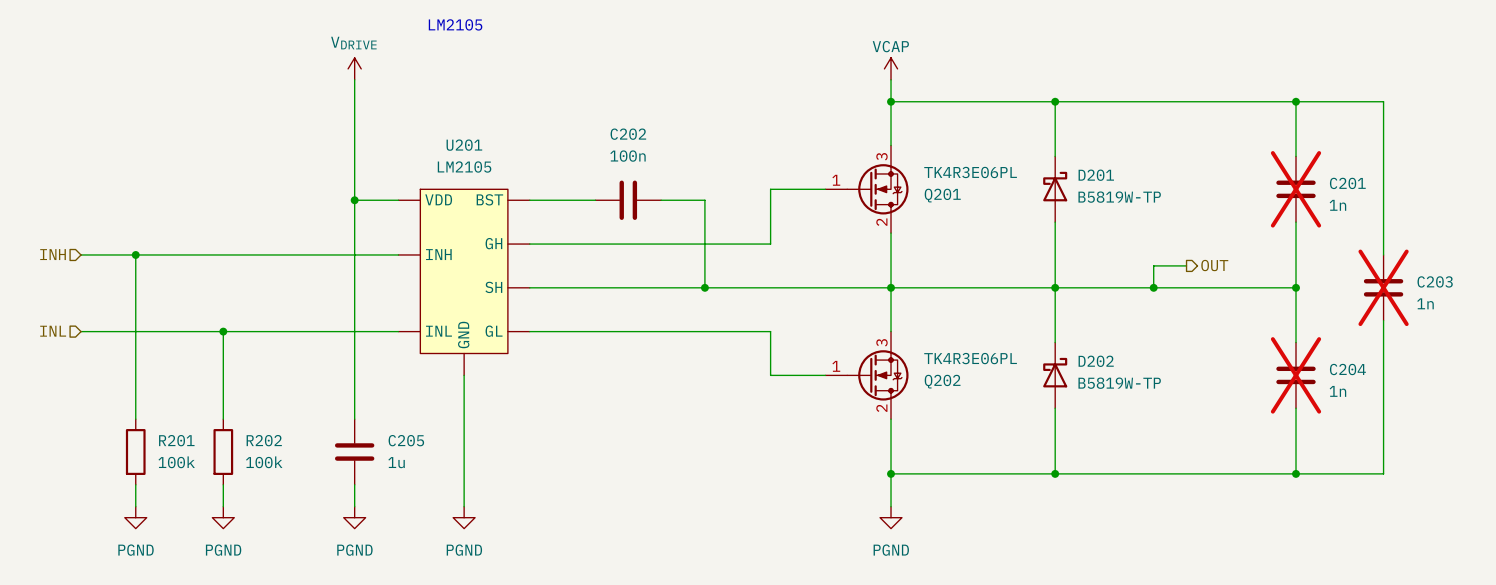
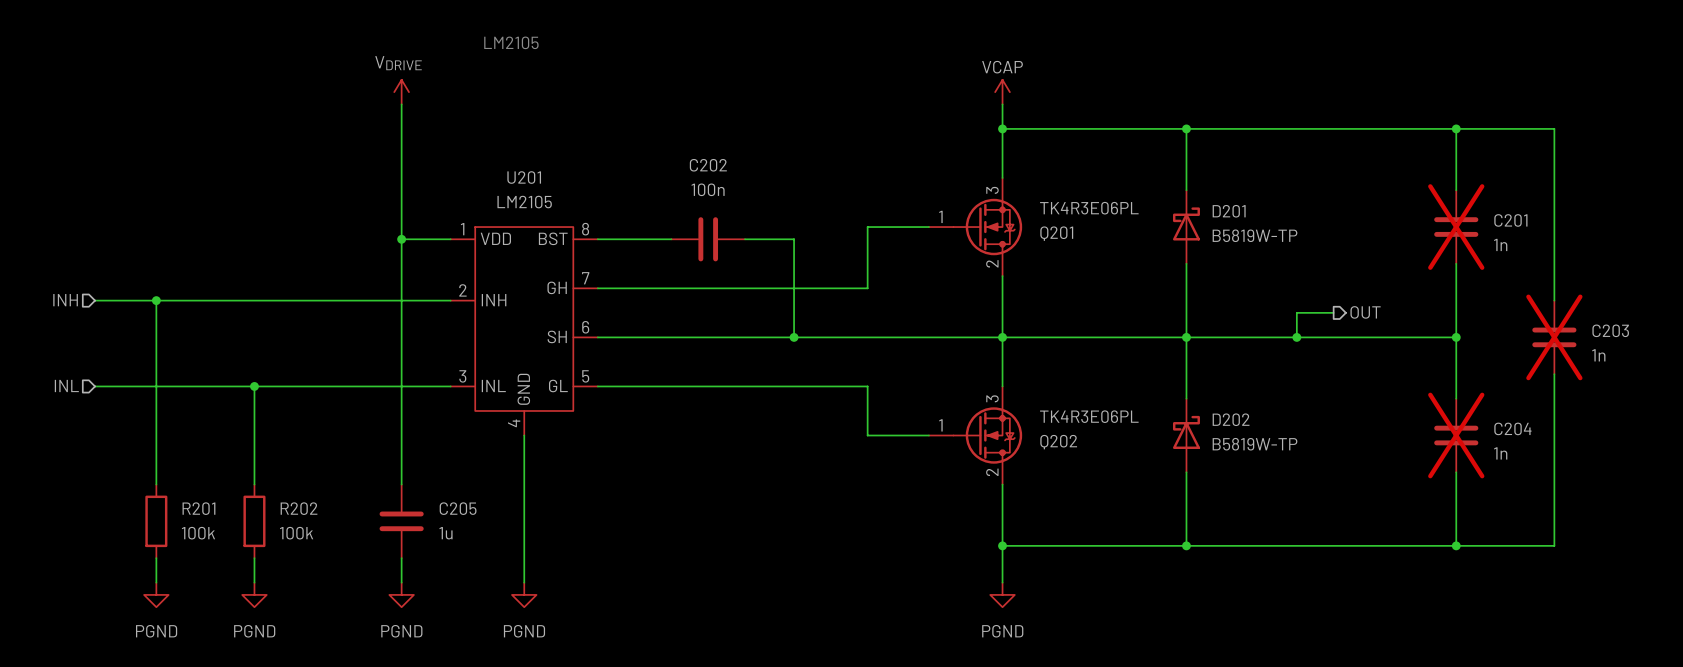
U201 pin number: none -> 1 (462, 229)
U201 pin number: none -> 8 (585, 229)
U201 pin number: none -> 7 (585, 278)
U201 pin number: none -> 2 (462, 290)
U201 pin number: none -> 6 (585, 327)
U201 pin number: none -> 3 (462, 376)
U201 pin number: none -> 5 (585, 376)
U201 pin number: none -> 4 (514, 423)

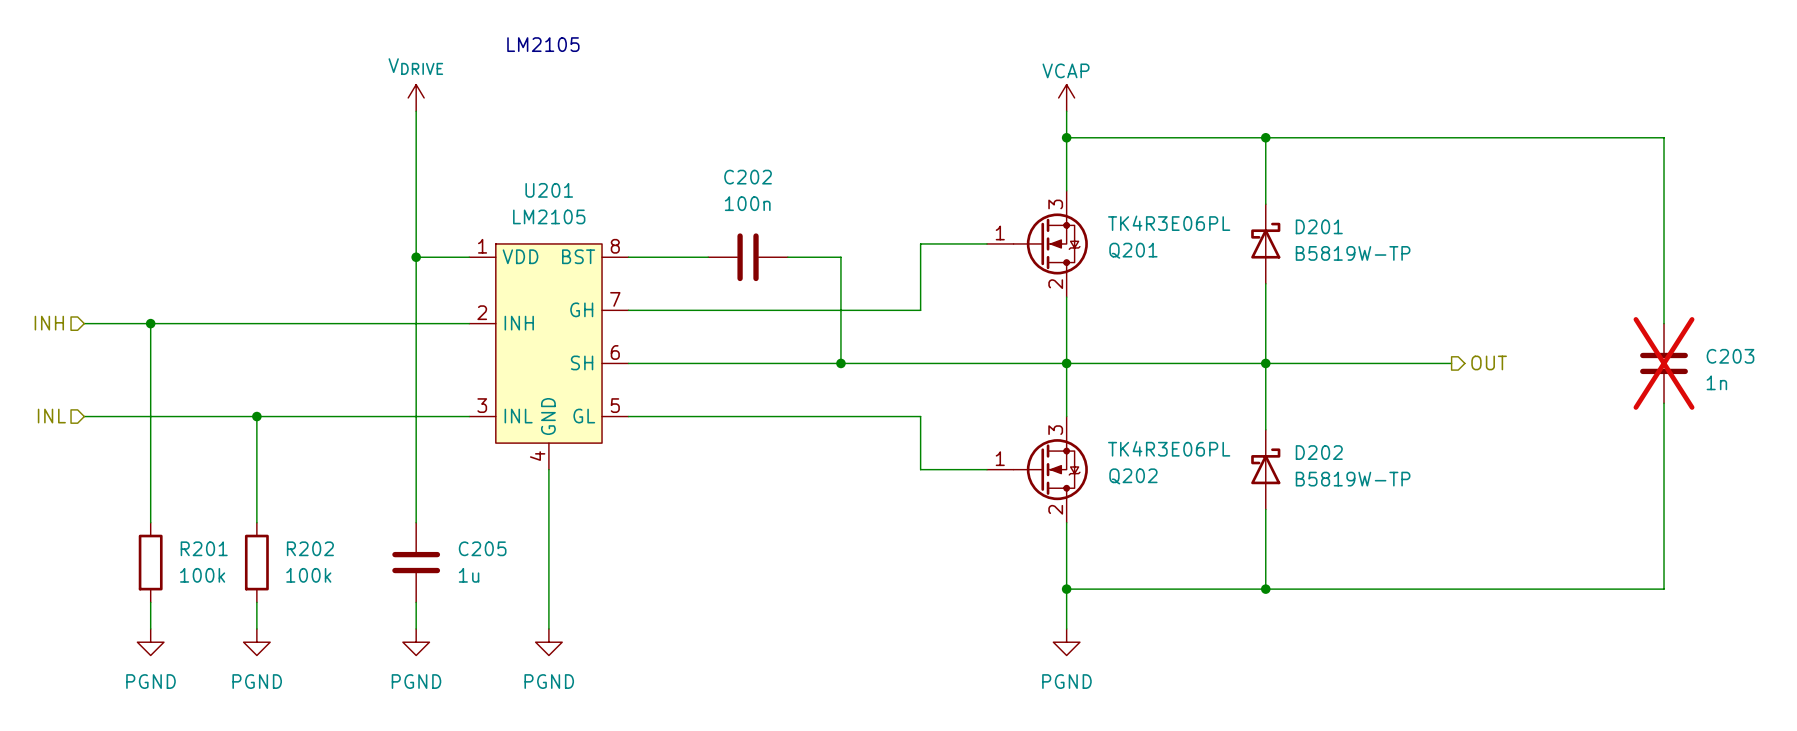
wire: (1456, 128) (1456, 190) -> none
junction: (1456, 128) -> none
C201: 1n (1456, 227) -> none
wire: (1456, 263) (1456, 398) -> none
wire: (1333, 312) (1296, 312) (1296, 337) -> none
hierarchical label position: OUT (1365, 312) -> OUT (1489, 362)
junction: (1296, 337) -> none
wire: (1358, 337) (1456, 337) -> none
junction: (1456, 337) -> none
C204: 1n (1456, 435) -> none
wire: (1456, 472) (1456, 545) -> none
junction: (1456, 545) -> none

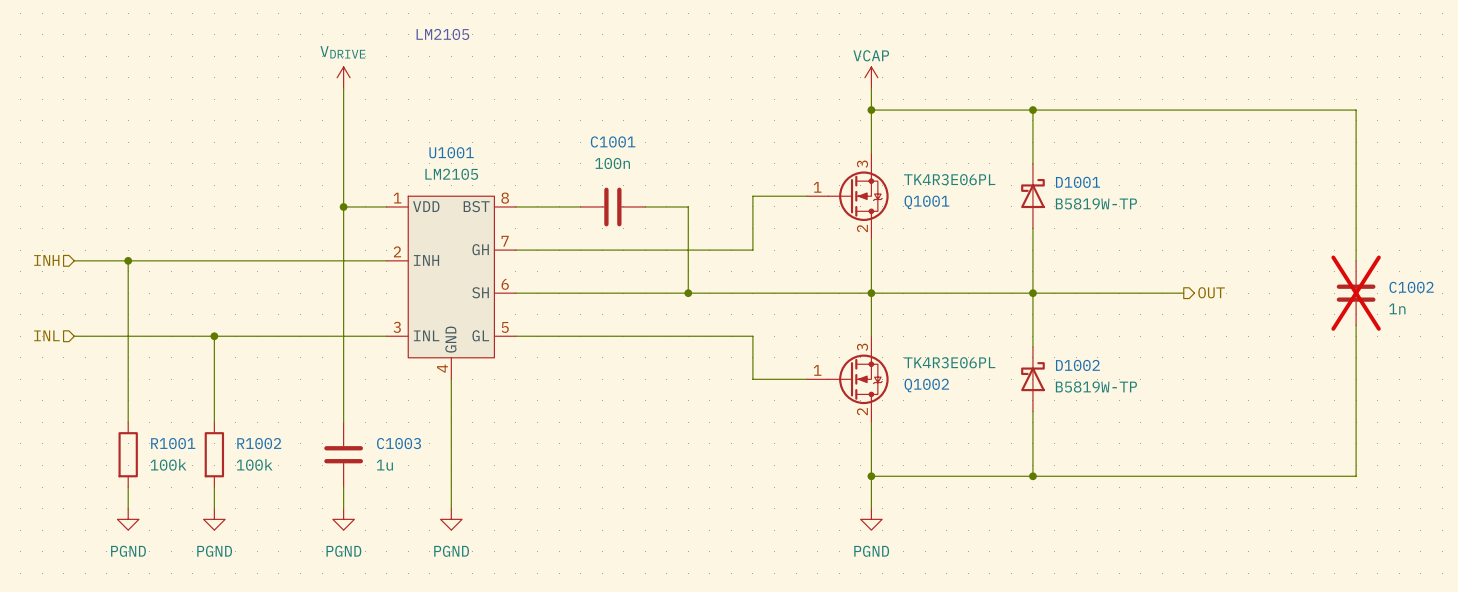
C202 name: C202 (748, 177) -> C1001 (613, 141)
U201 name: U201 (549, 190) -> U1001 (451, 152)
D201 name: D201 (1319, 226) -> D1001 (1078, 182)
Q201 name: Q201 (1133, 250) -> Q1001 (926, 202)
C203 name: C203 (1730, 356) -> C1002 (1411, 287)
D202 name: D202 (1319, 452) -> D1002 (1077, 365)
Q202 name: Q202 (1133, 476) -> Q1002 (926, 385)
R201 name: R201 (204, 548) -> R1001 (173, 443)
R202 name: R202 (310, 548) -> R1002 (259, 443)
C205 name: C205 (482, 548) -> C1003 (398, 443)

